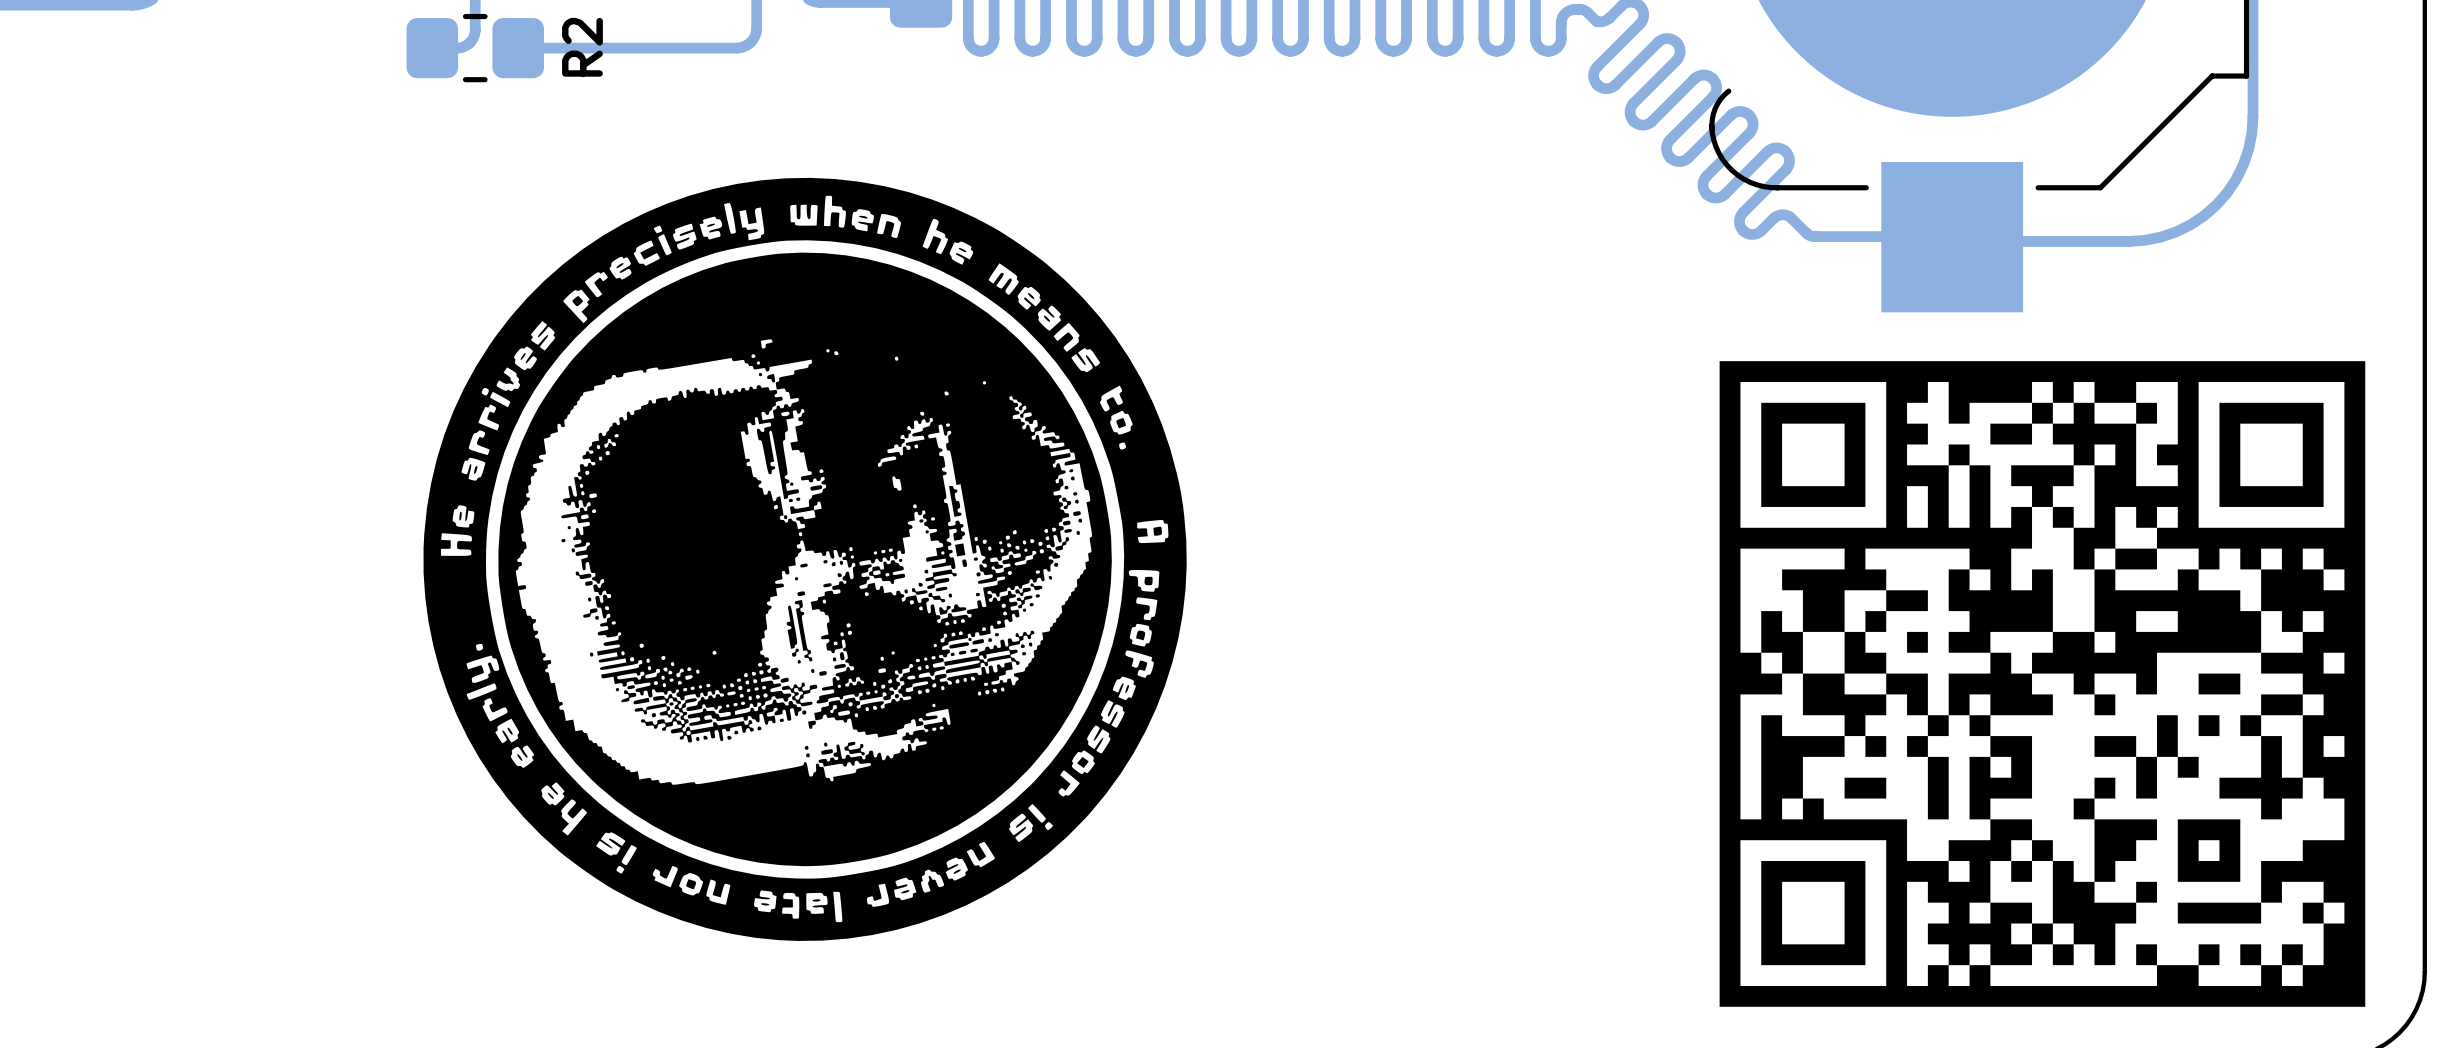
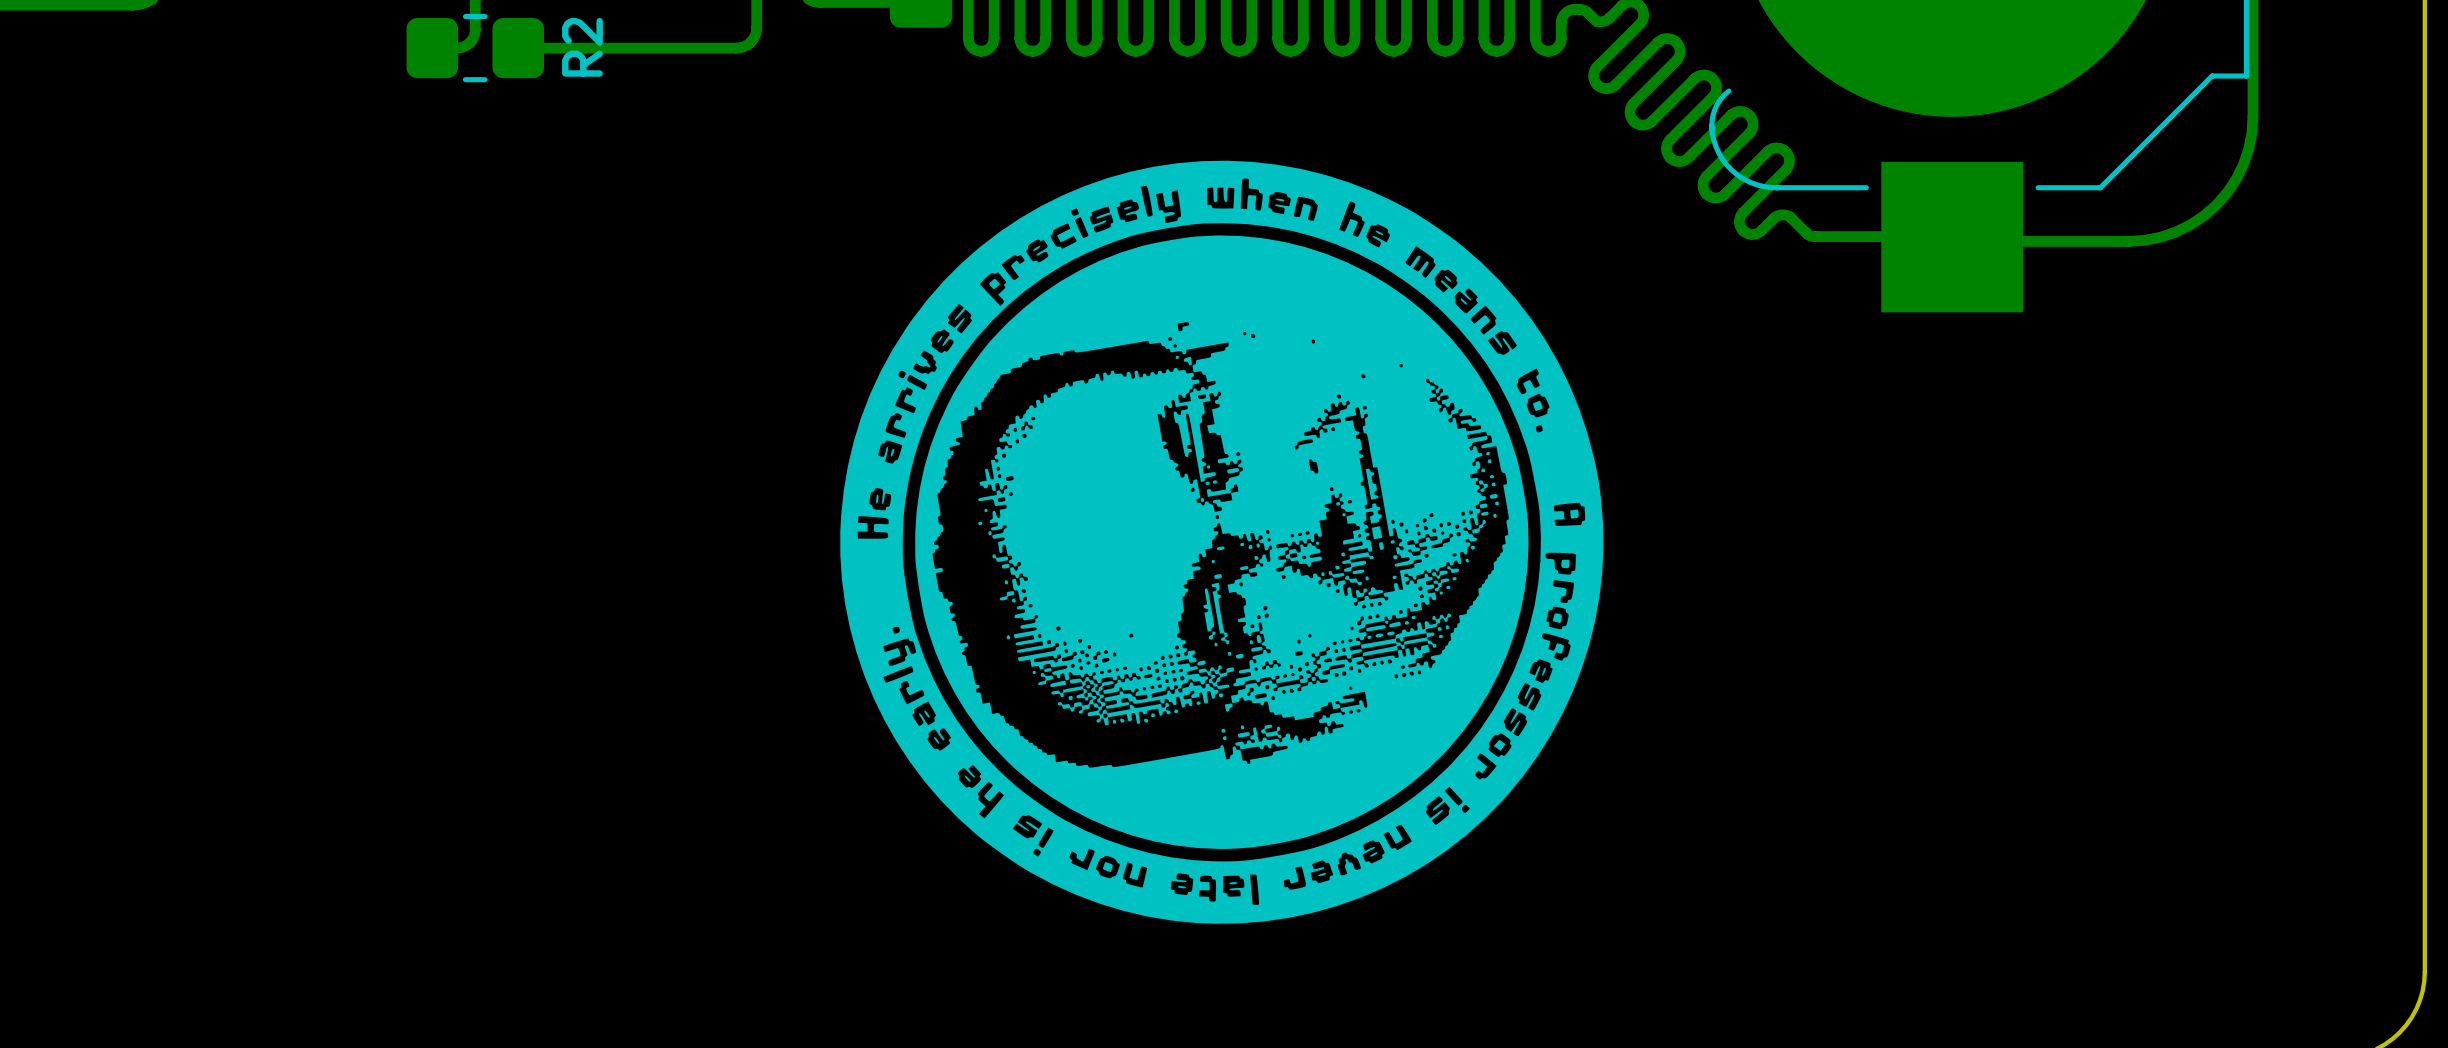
drawing: [1719, 361, 2366, 1007] -> none
drawing position: (805, 559) -> (1221, 542)

